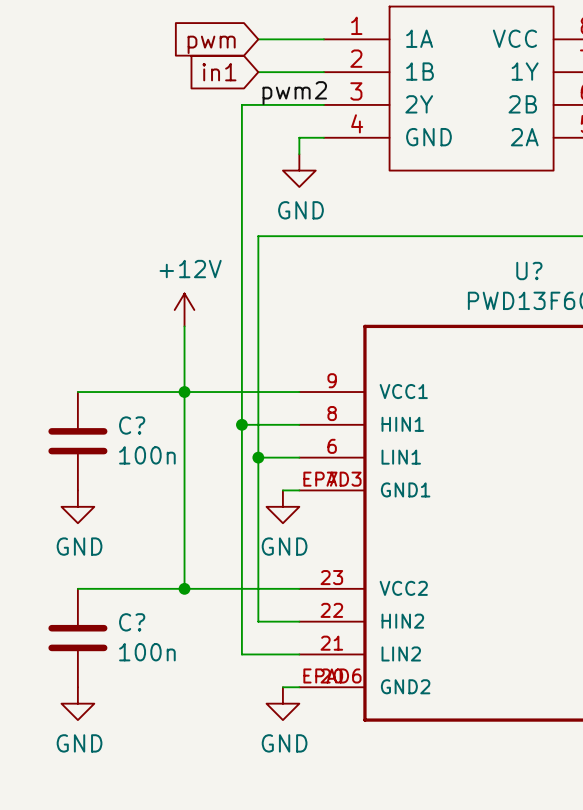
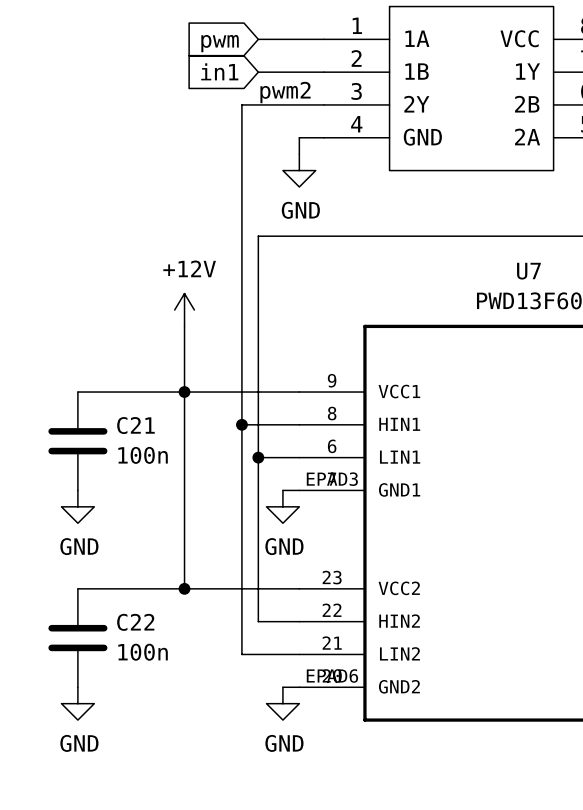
U? name: U? (529, 271) -> U7 (528, 271)
C? name: C? (132, 425) -> C21 (135, 425)
C? name: C? (132, 622) -> C22 (135, 622)

